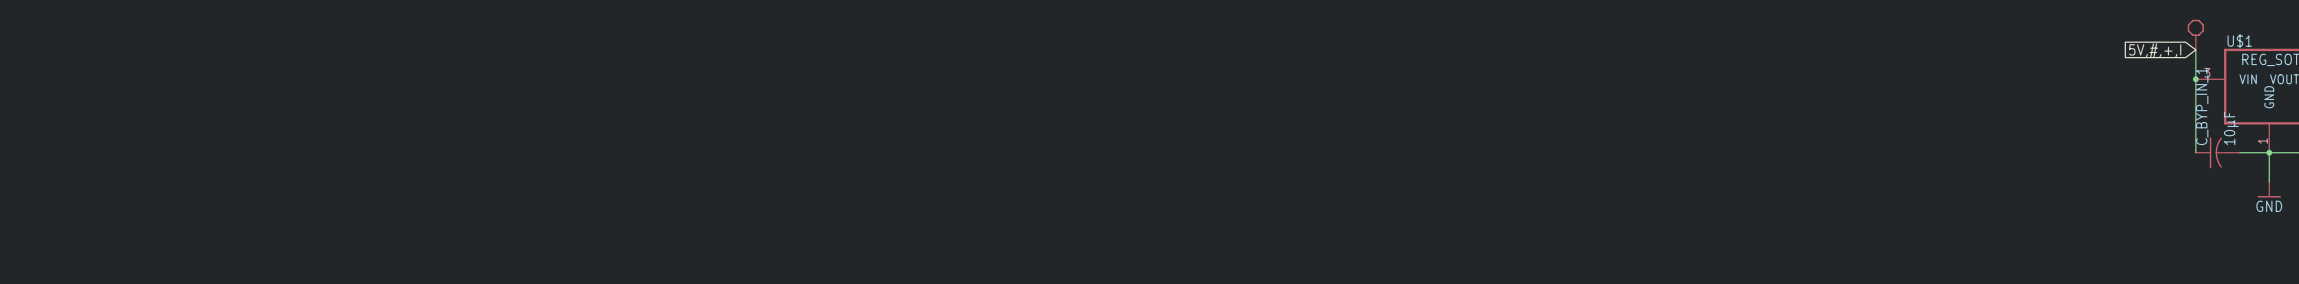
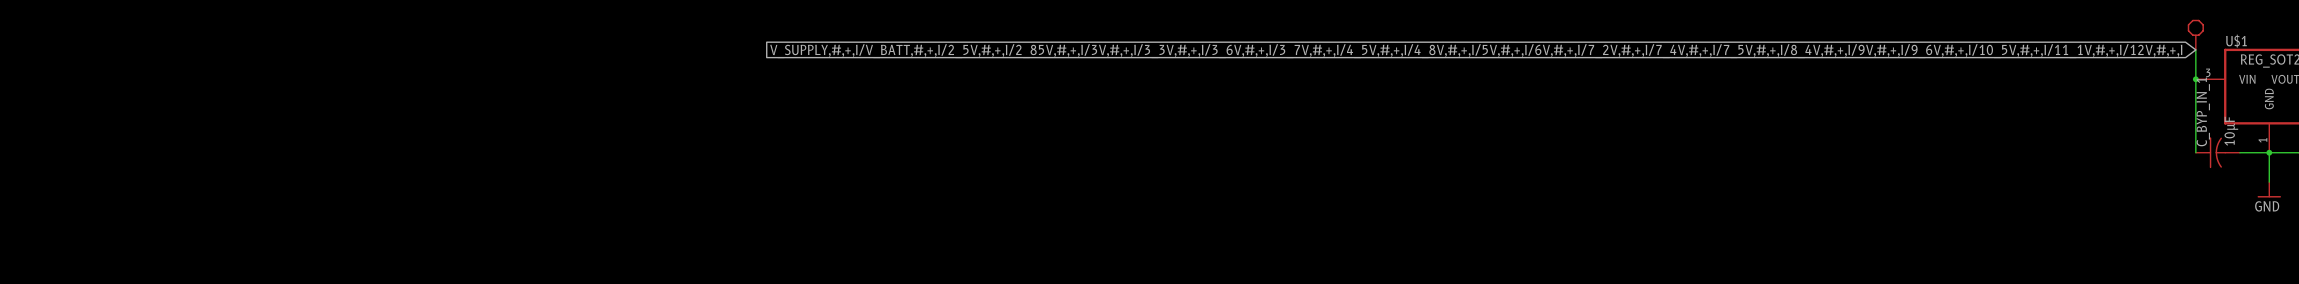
global label: 5V,#,+,I (2155, 50) -> V_SUPPLY,#,+,I/V_BATT,#,+,I/2_5V,#,+,I/2_85V,#,+,I/3V,#,+,I/3_3V,#,+,I/3_6V,#,+,I/3_7V,#,+,I/4_5V,#,+,I/4_8V,#,+,I/5V,#,+,I/6V,#,+,I/7_2V,#,+,I/7_4V,#,+,I/7_5V,#,+,I/8_4V,#,+,I/9V,#,+,I/9_6V,#,+,I/10_5V,#,+,I/11_1V,#,+,I/12V,#,+,I (1476, 51)

